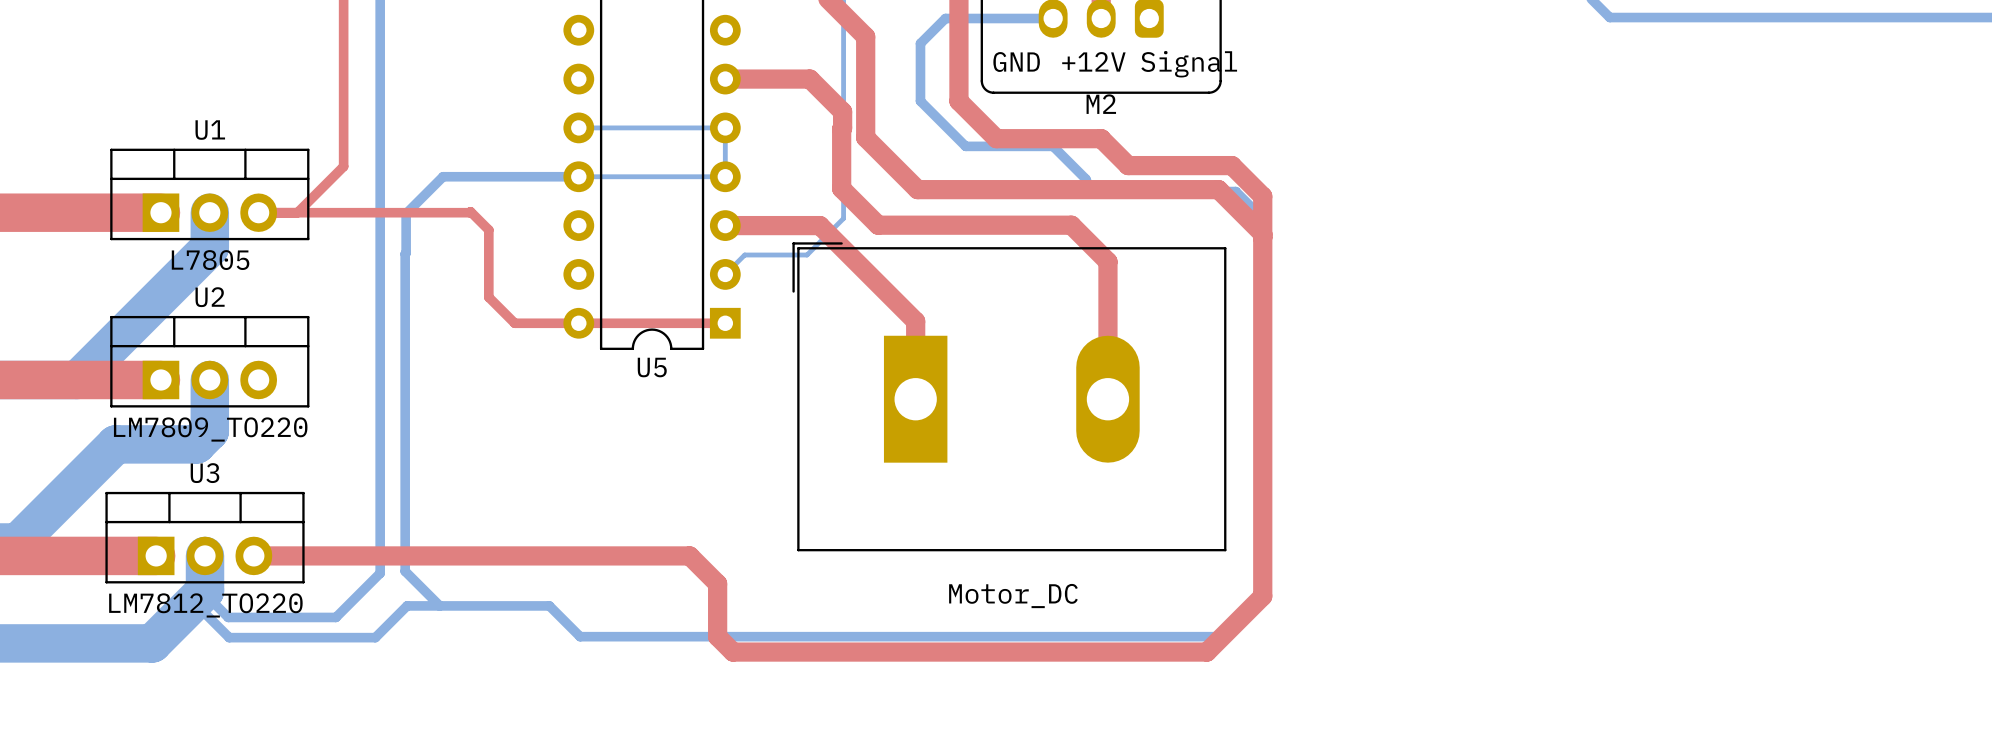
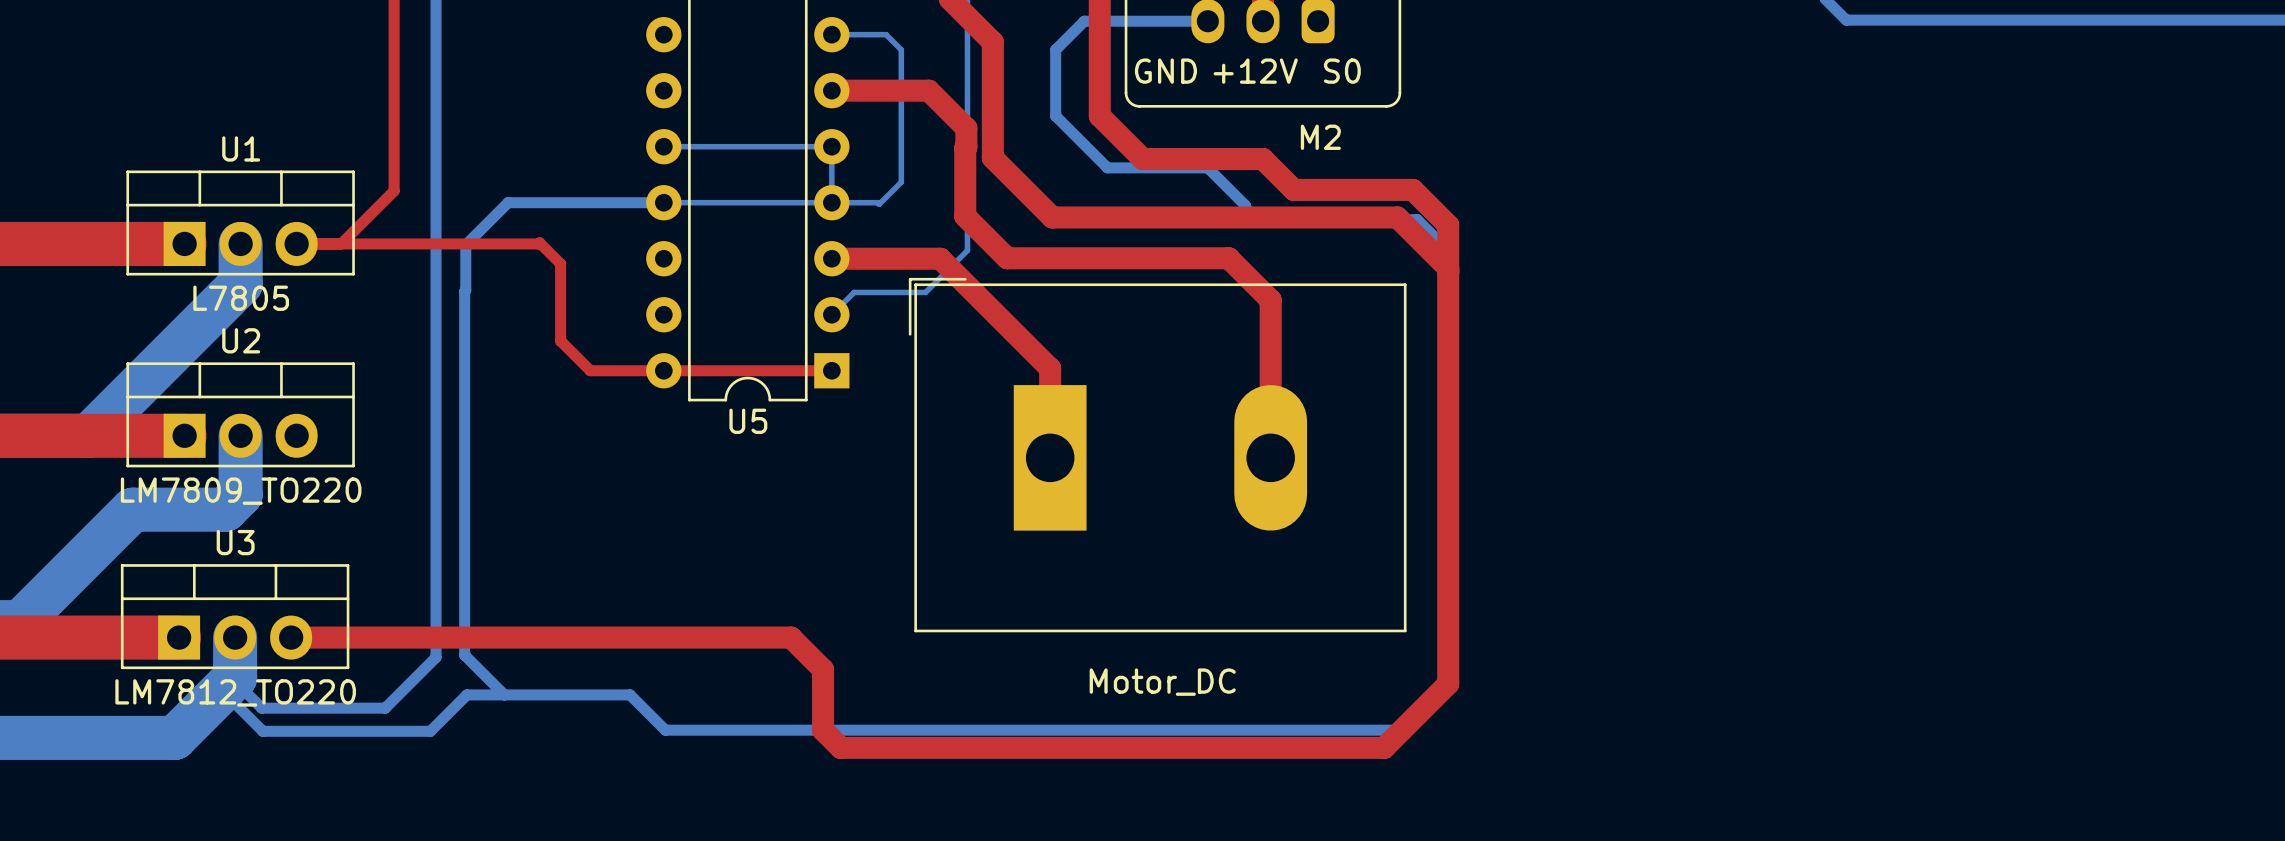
bottom track: none -> (831, 34) (886, 34) (901, 49) (901, 182) (879, 204) (831, 202)
text: Signal (1189, 64) -> S0 (1342, 71)
M2 name position: M2 (1101, 104) -> M2 (1320, 137)

